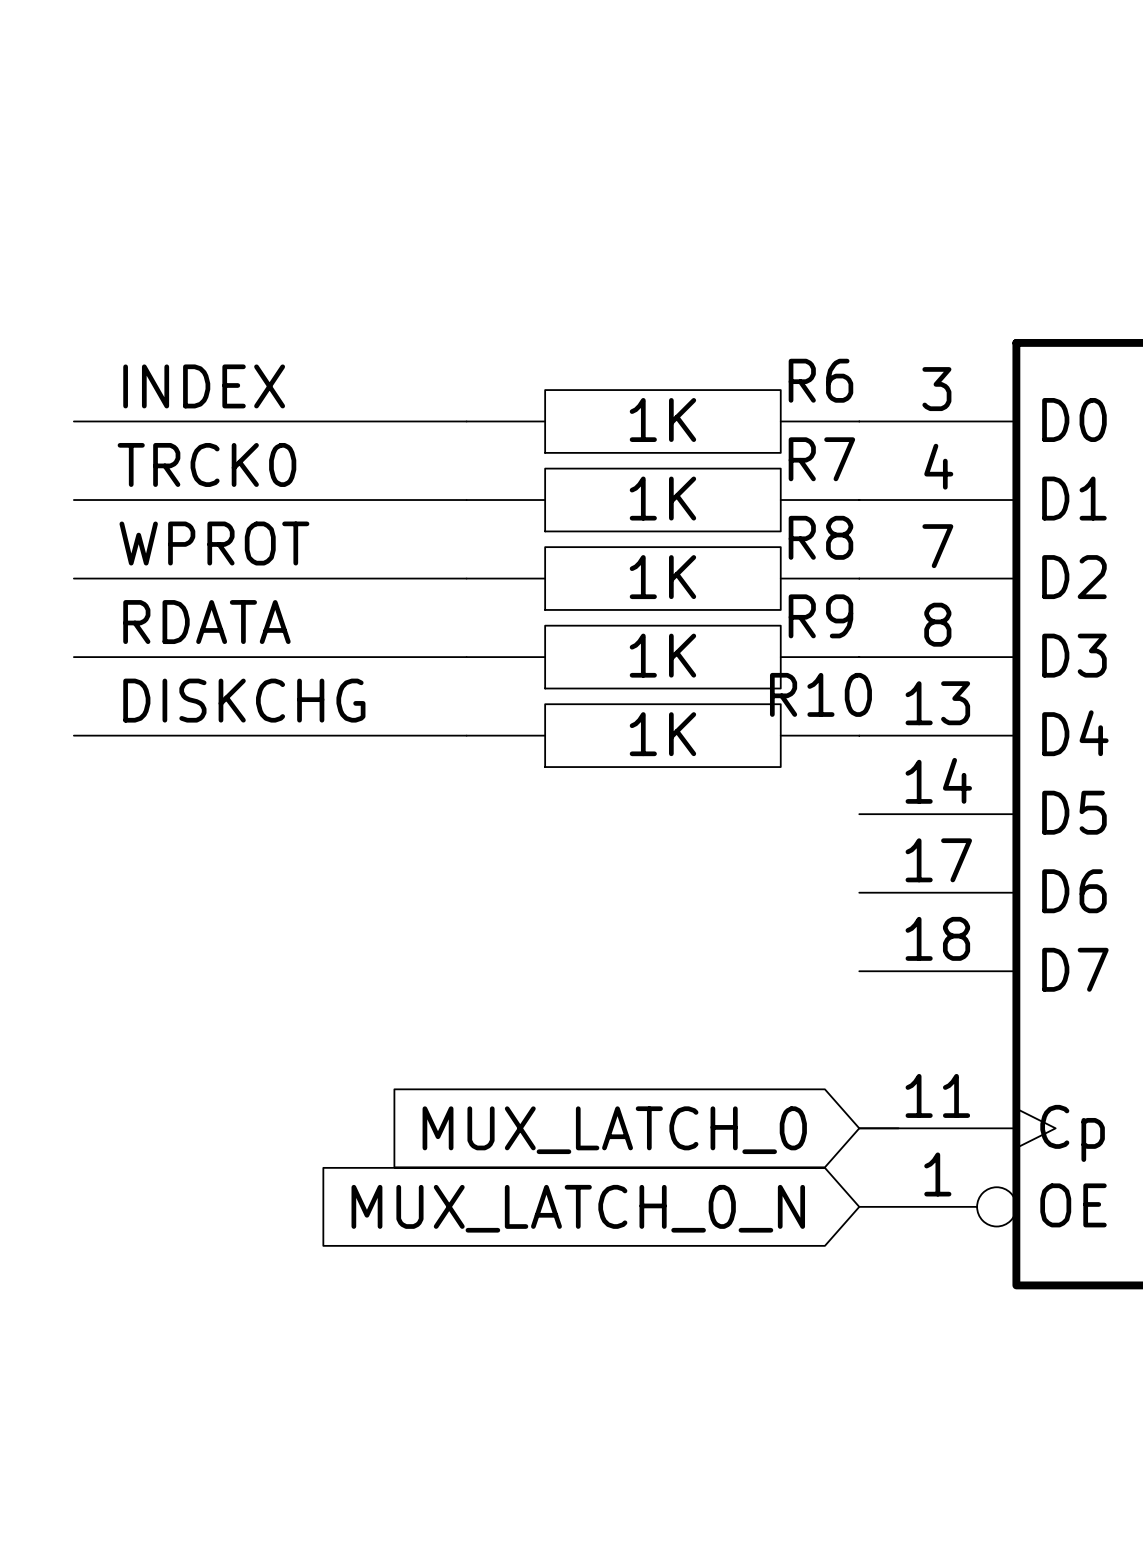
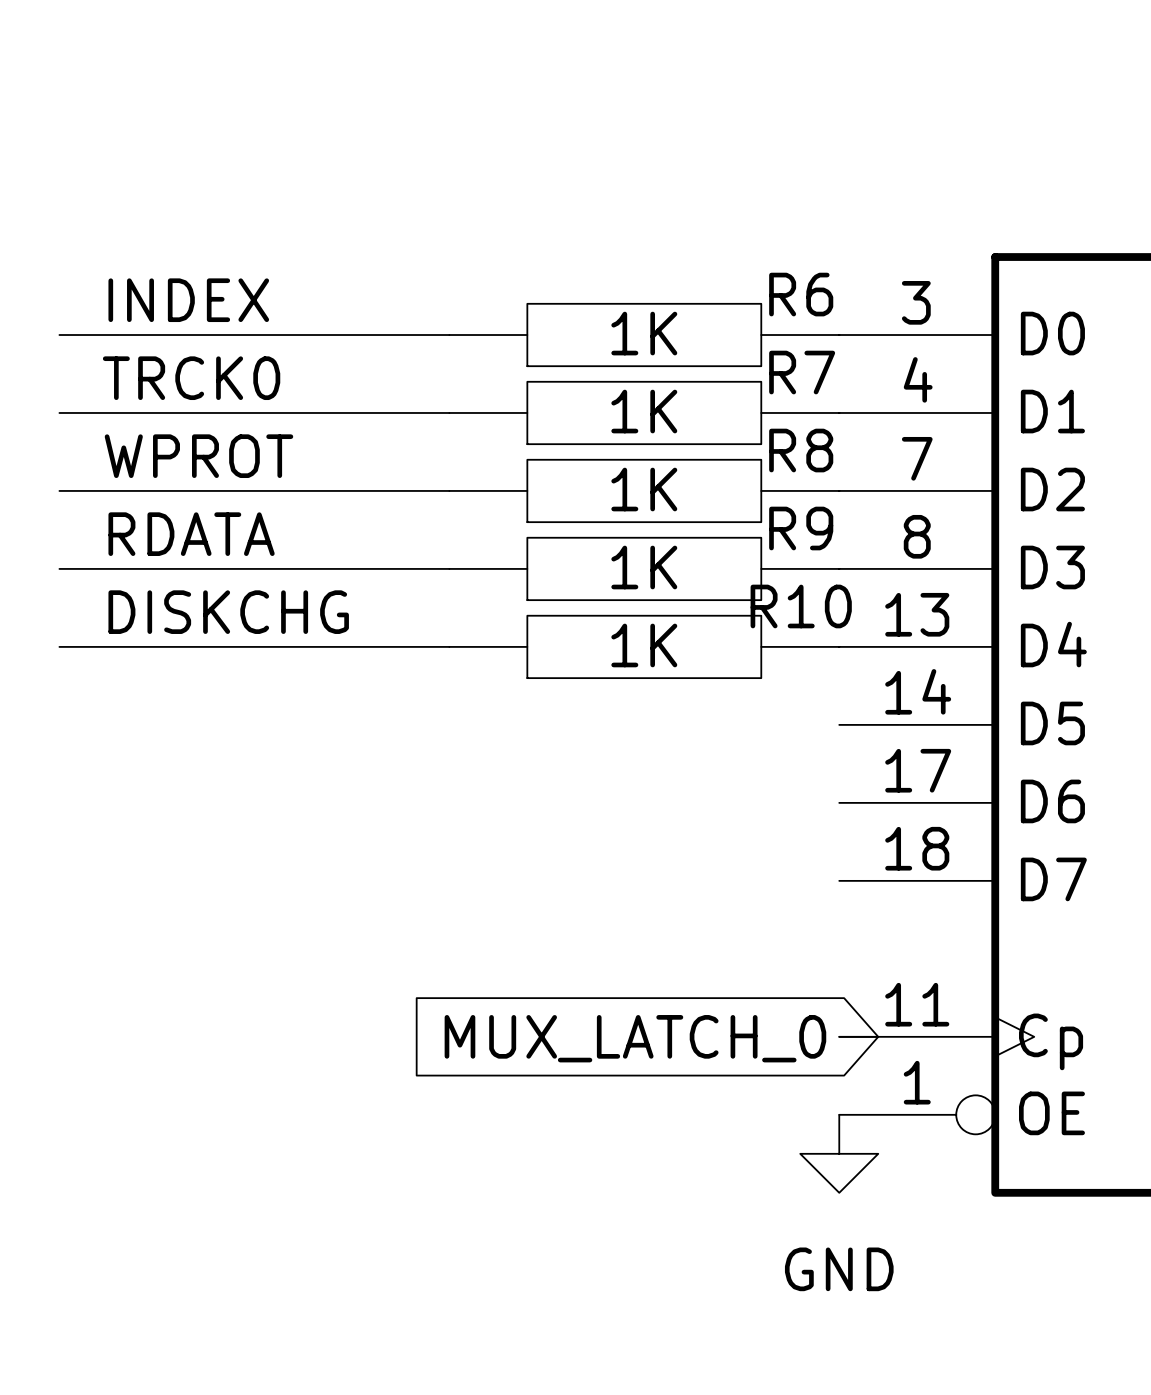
global label position: MUX_LATCH_0 (614, 1130) -> MUX_LATCH_0 (635, 1038)
global label: MUX_LATCH_0_N (578, 1208) -> none
power symbol: none -> GND (839, 1153)

